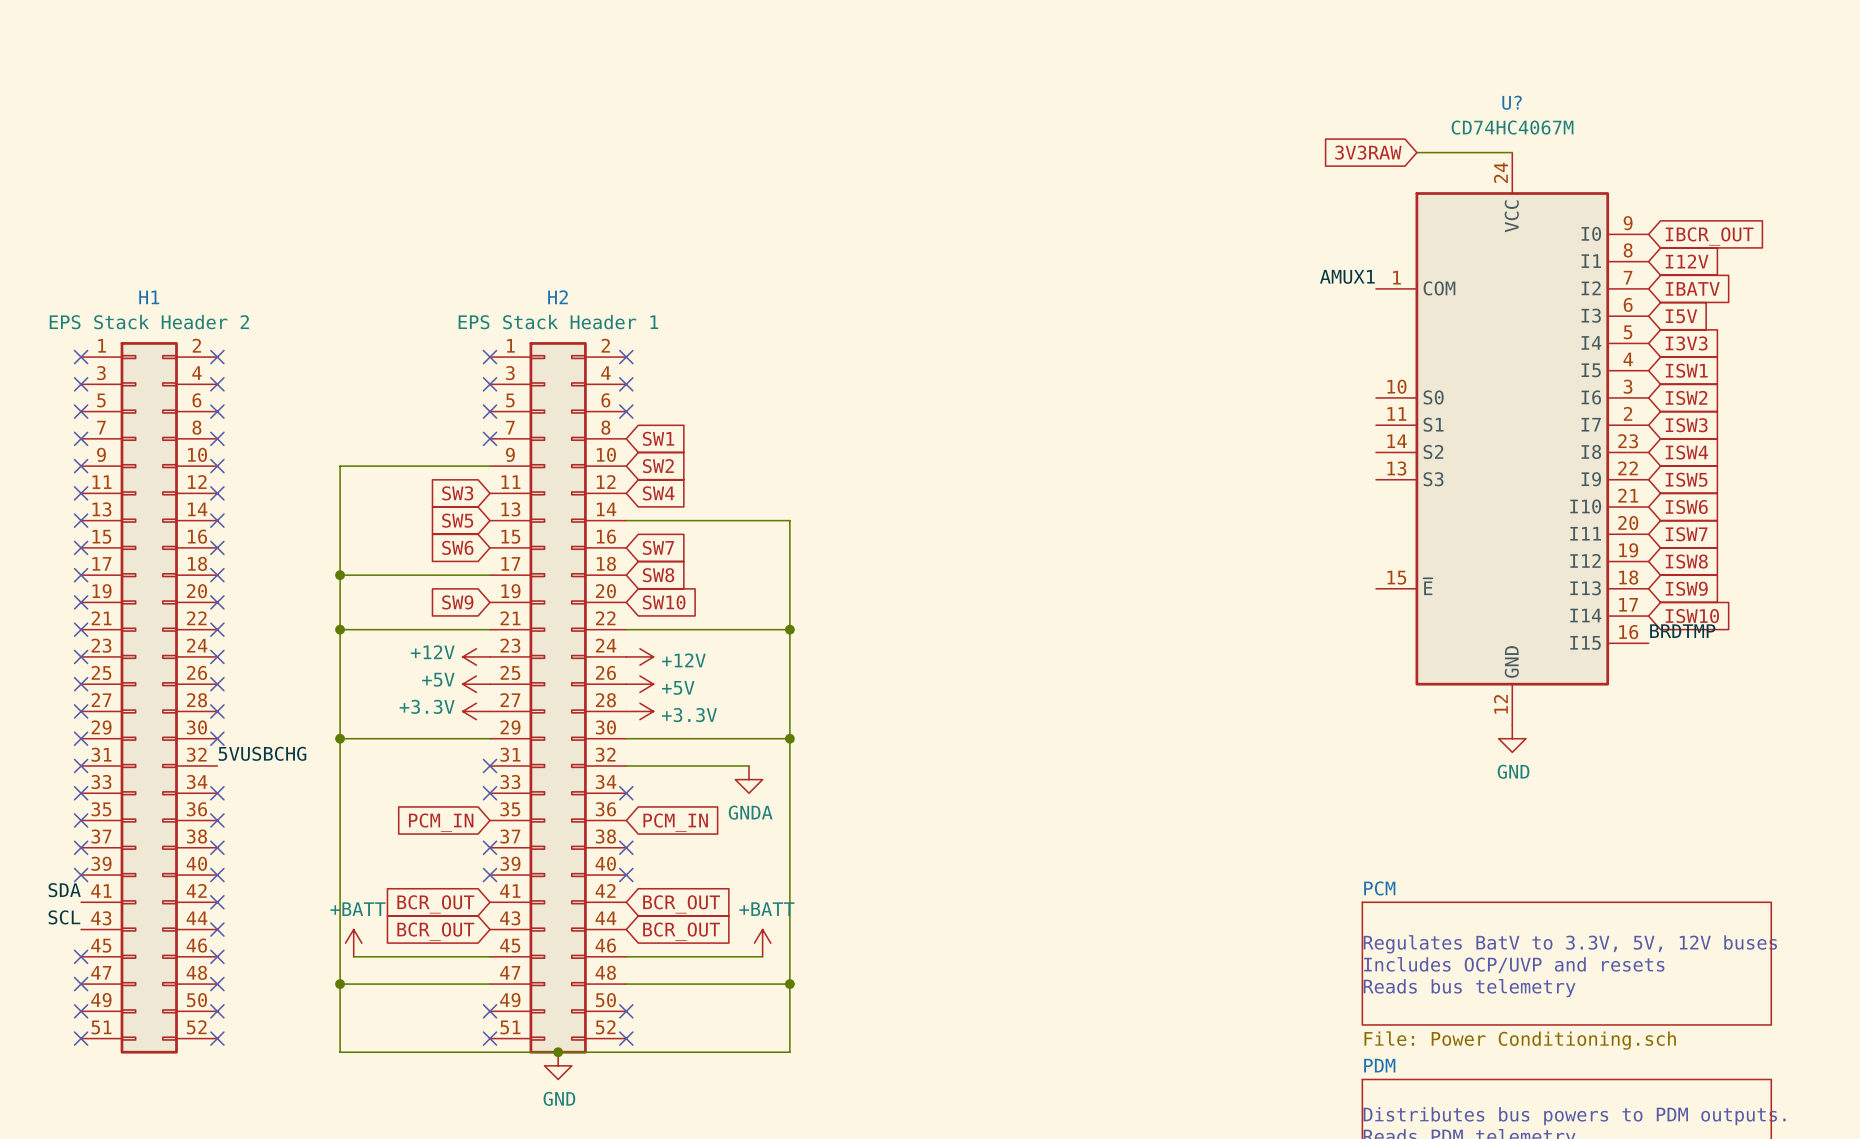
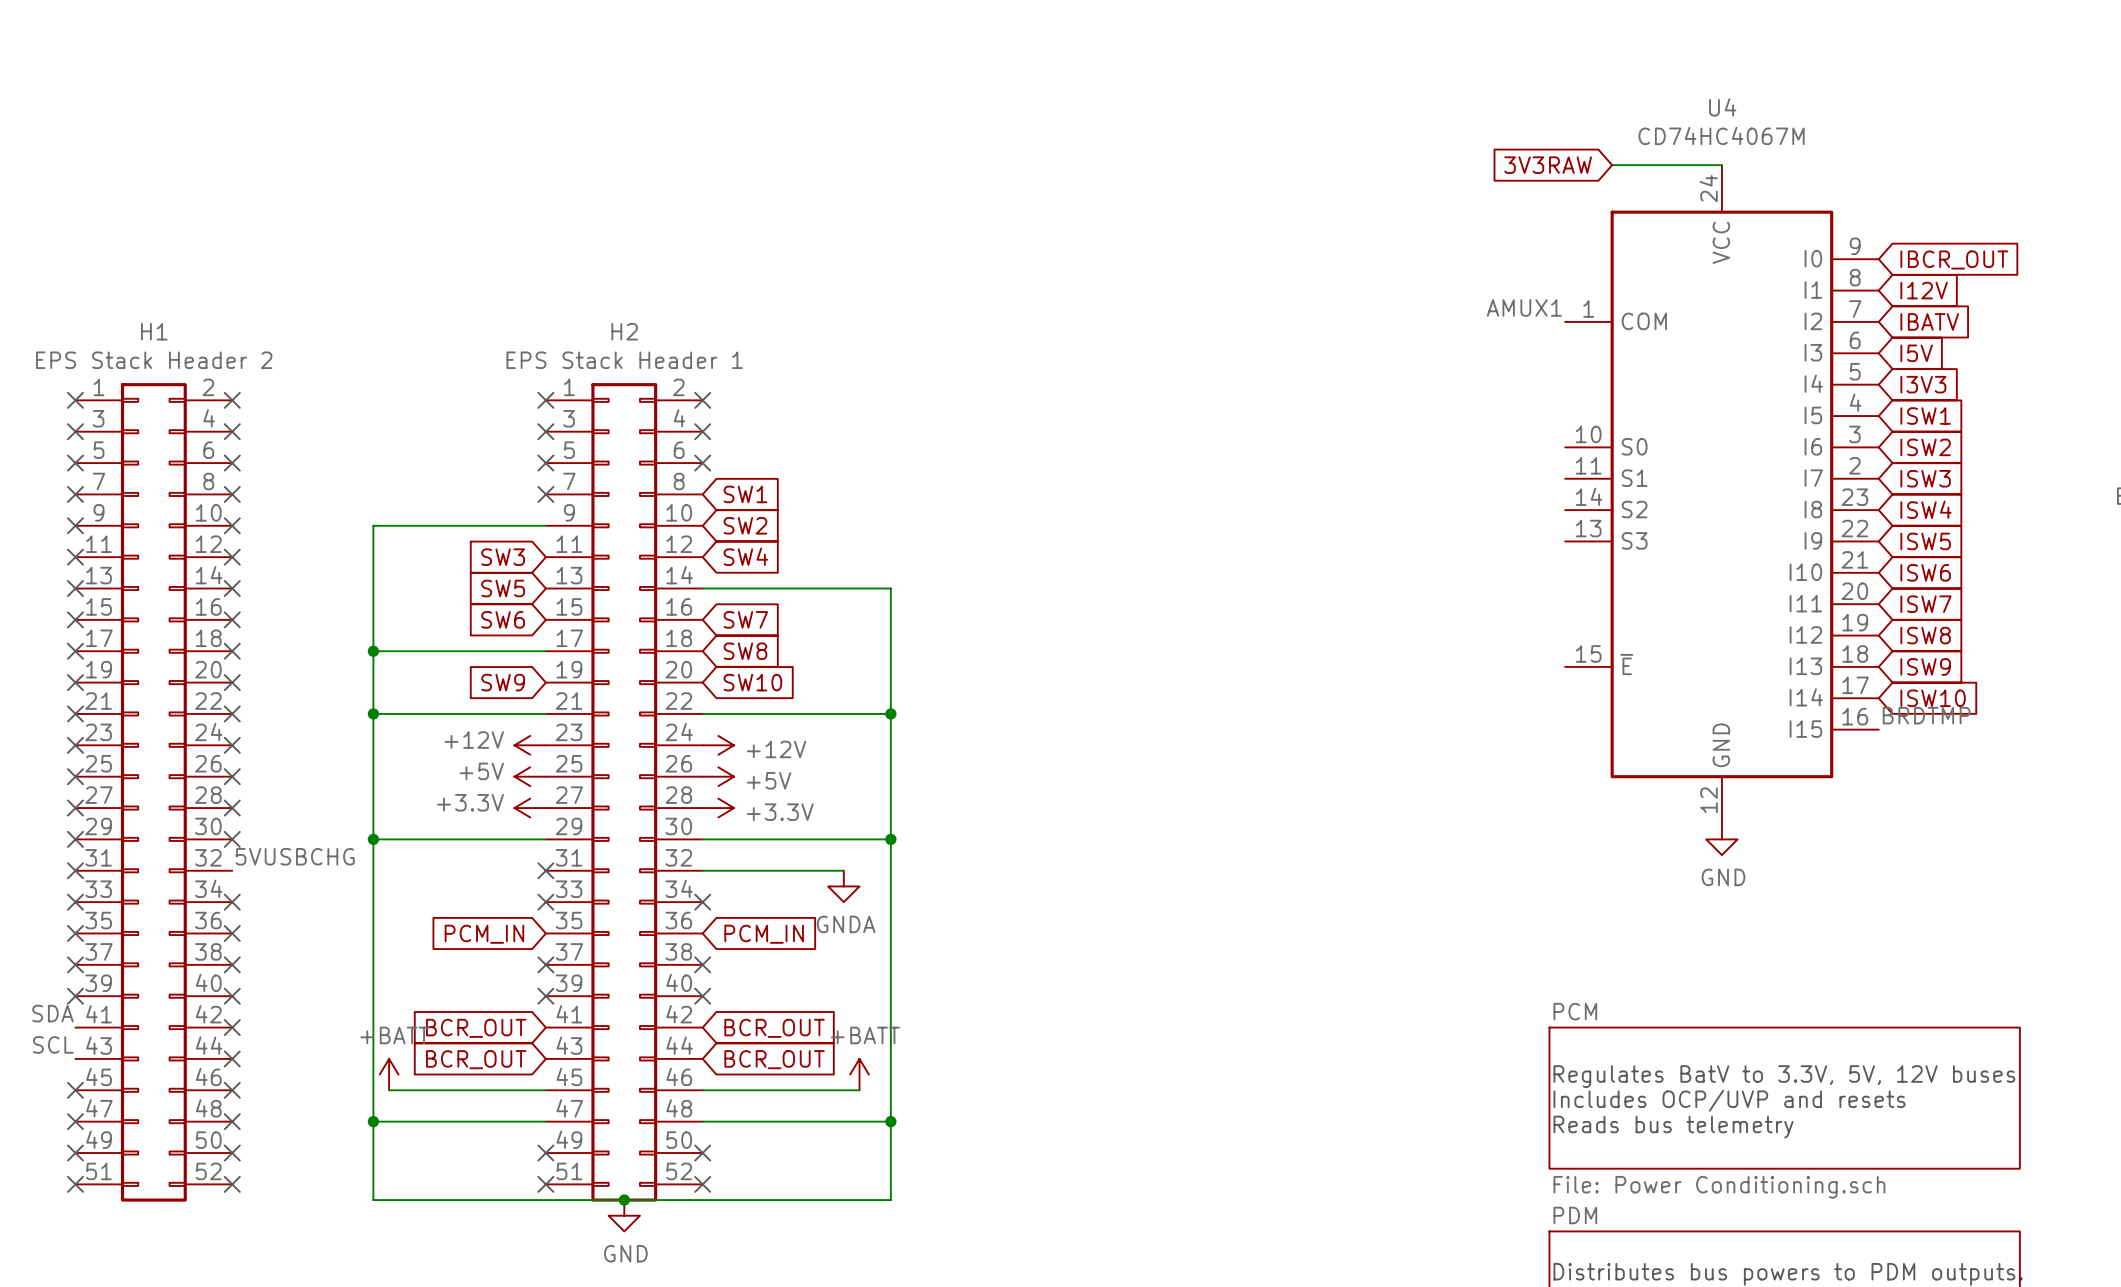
U? name: U? (1512, 102) -> U4 (1722, 107)

